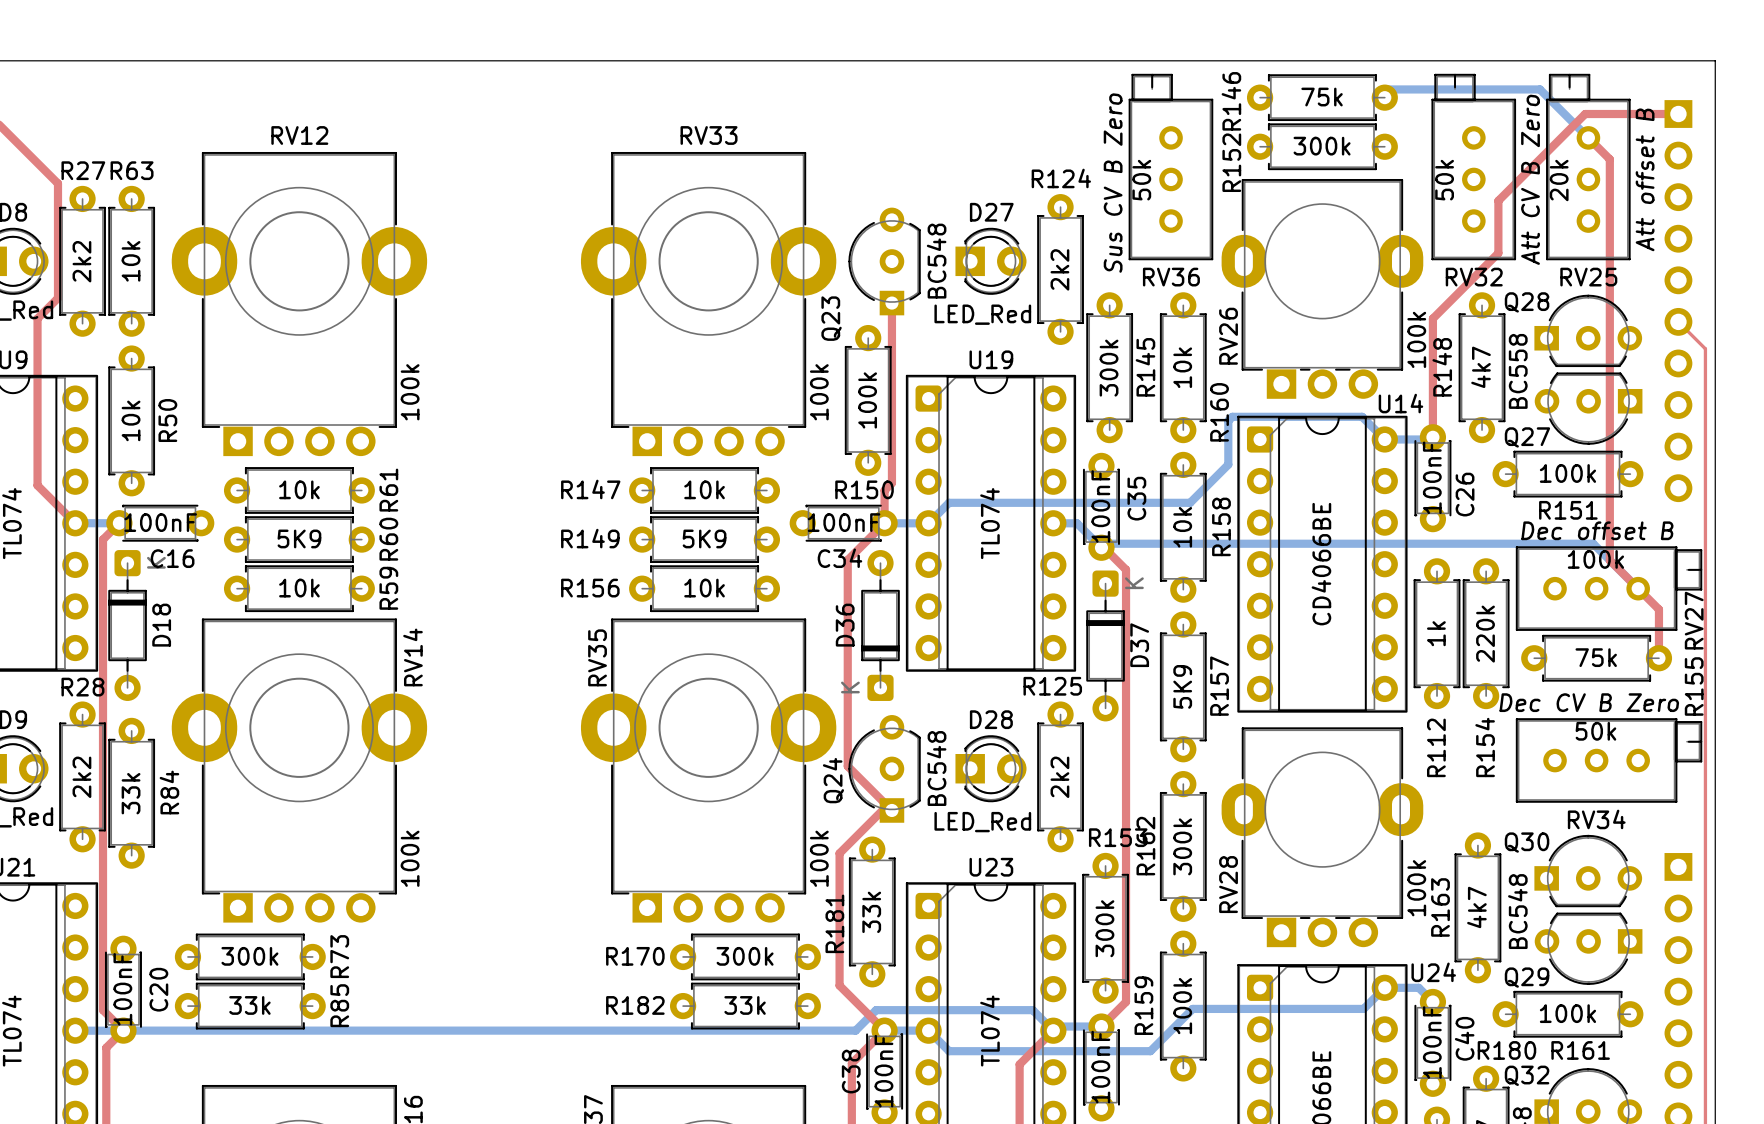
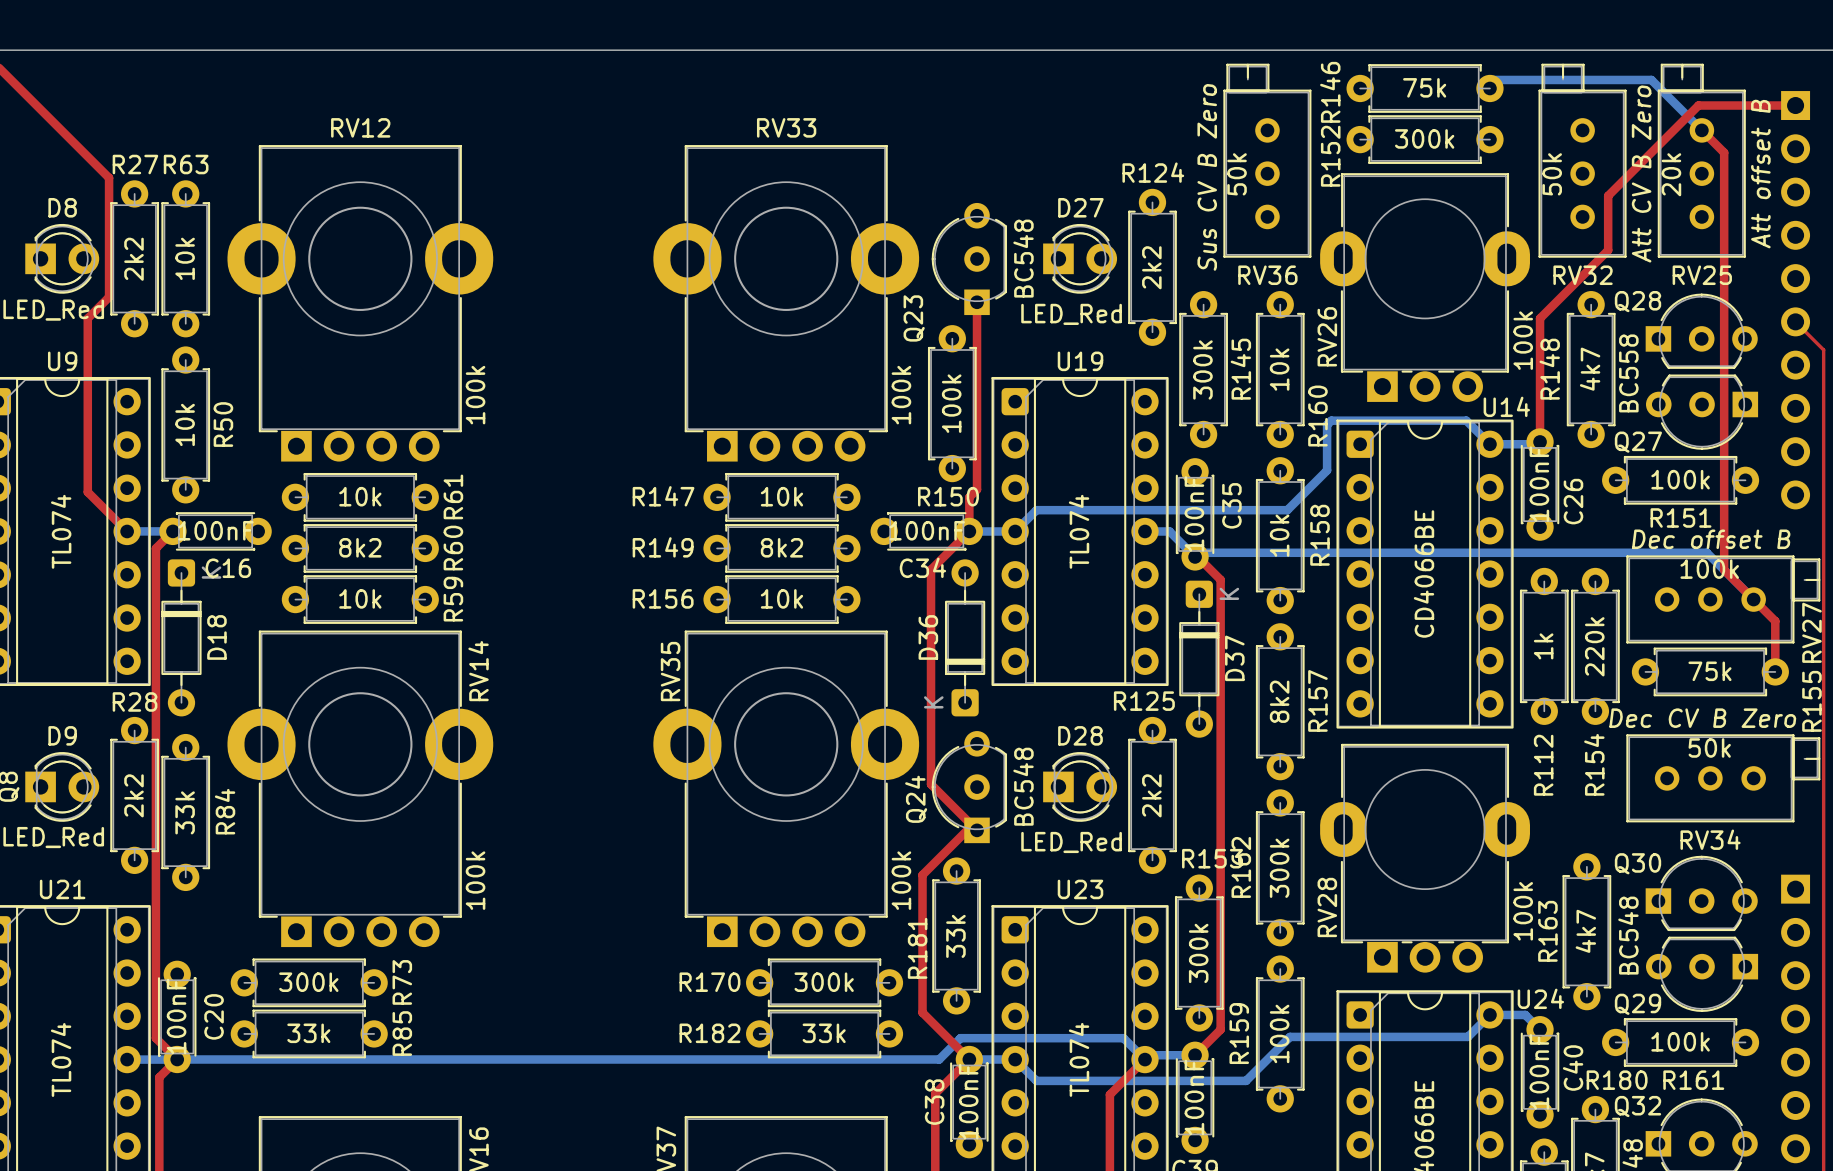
R60 value: 5K9 (299, 538) -> 8k2 (360, 547)
R149 value: 5K9 (704, 538) -> 8k2 (781, 547)
R157 value: 5K9 (1182, 686) -> 8k2 (1279, 701)

